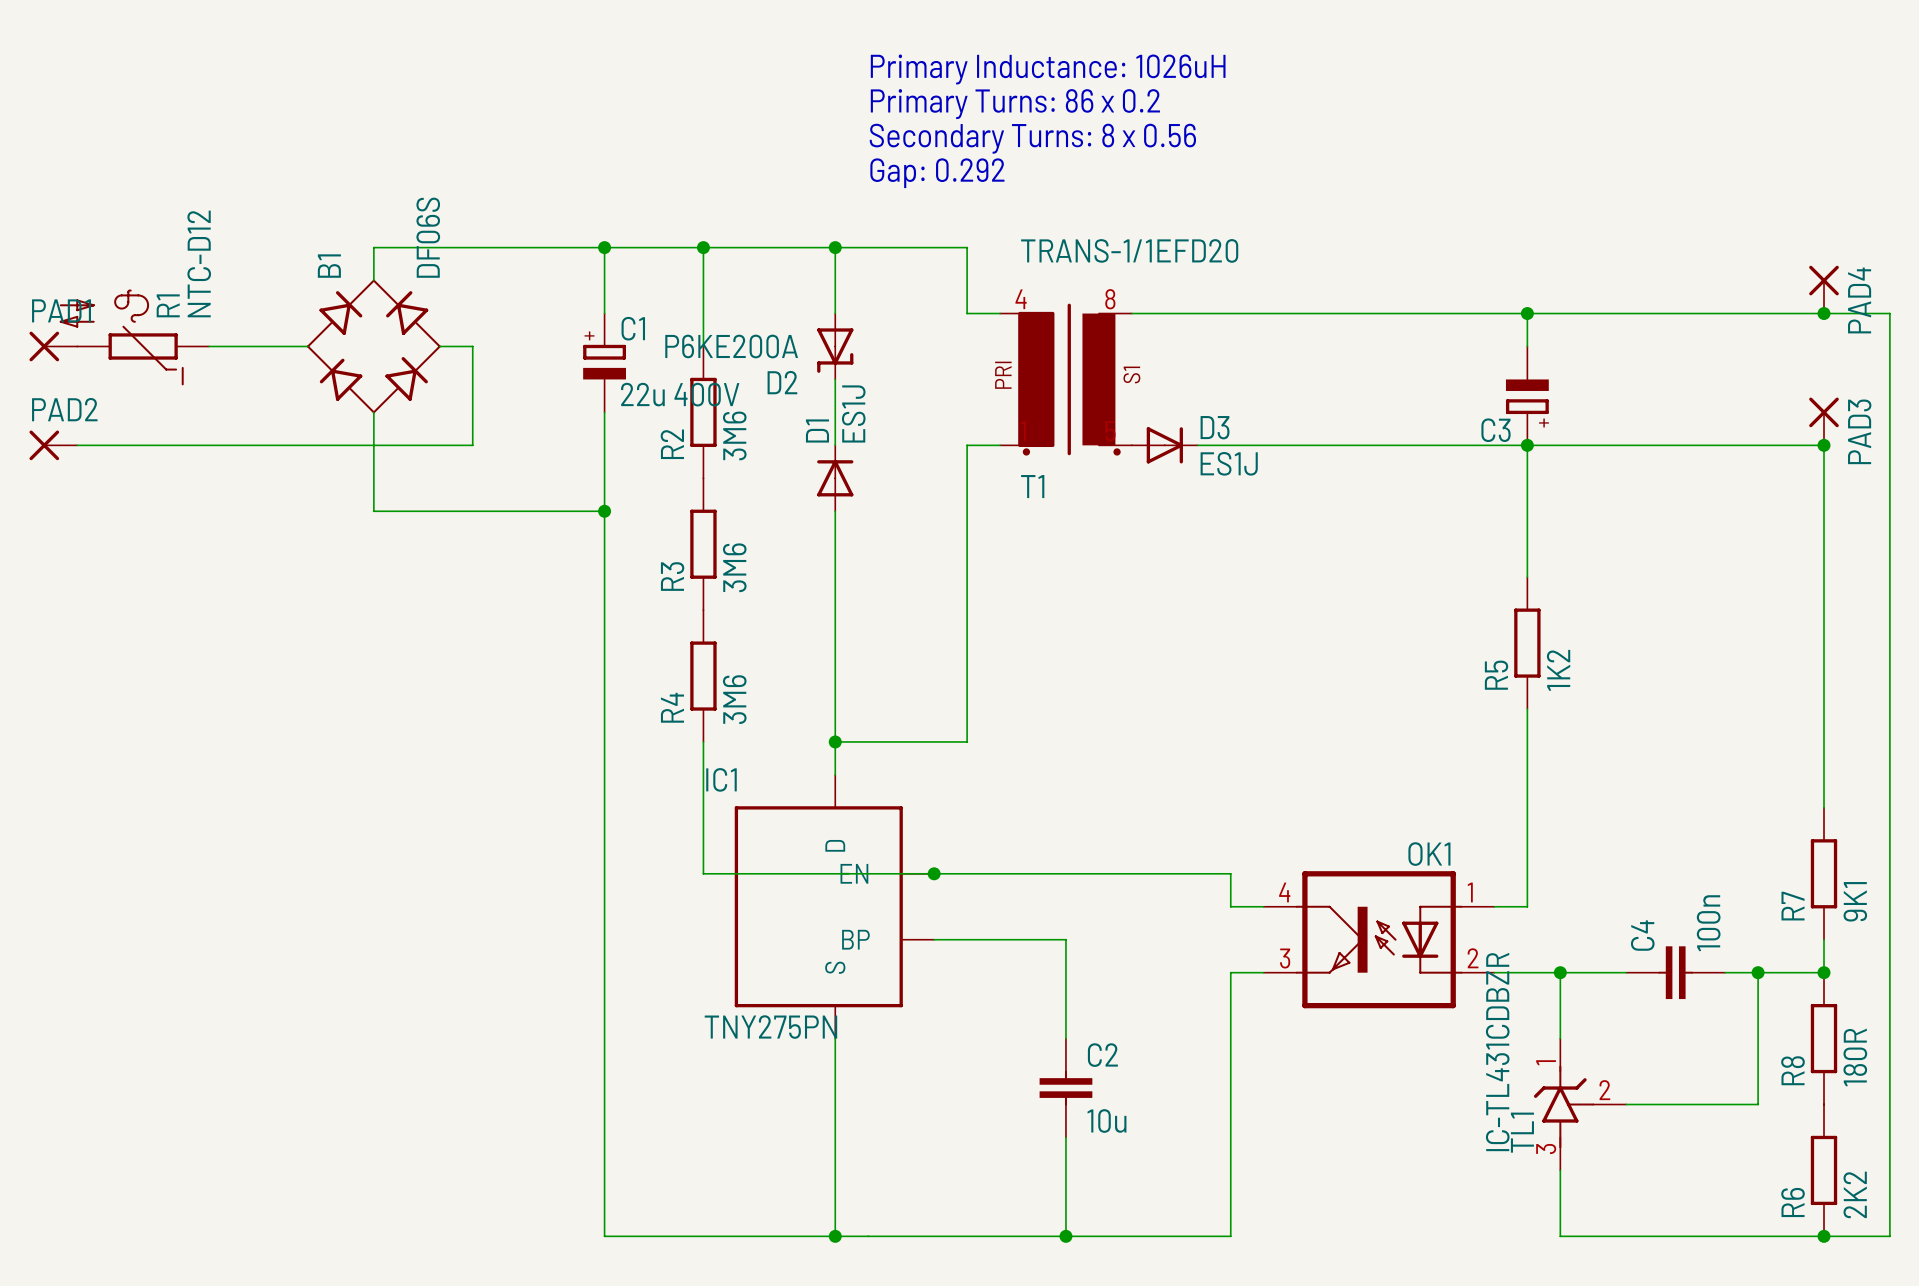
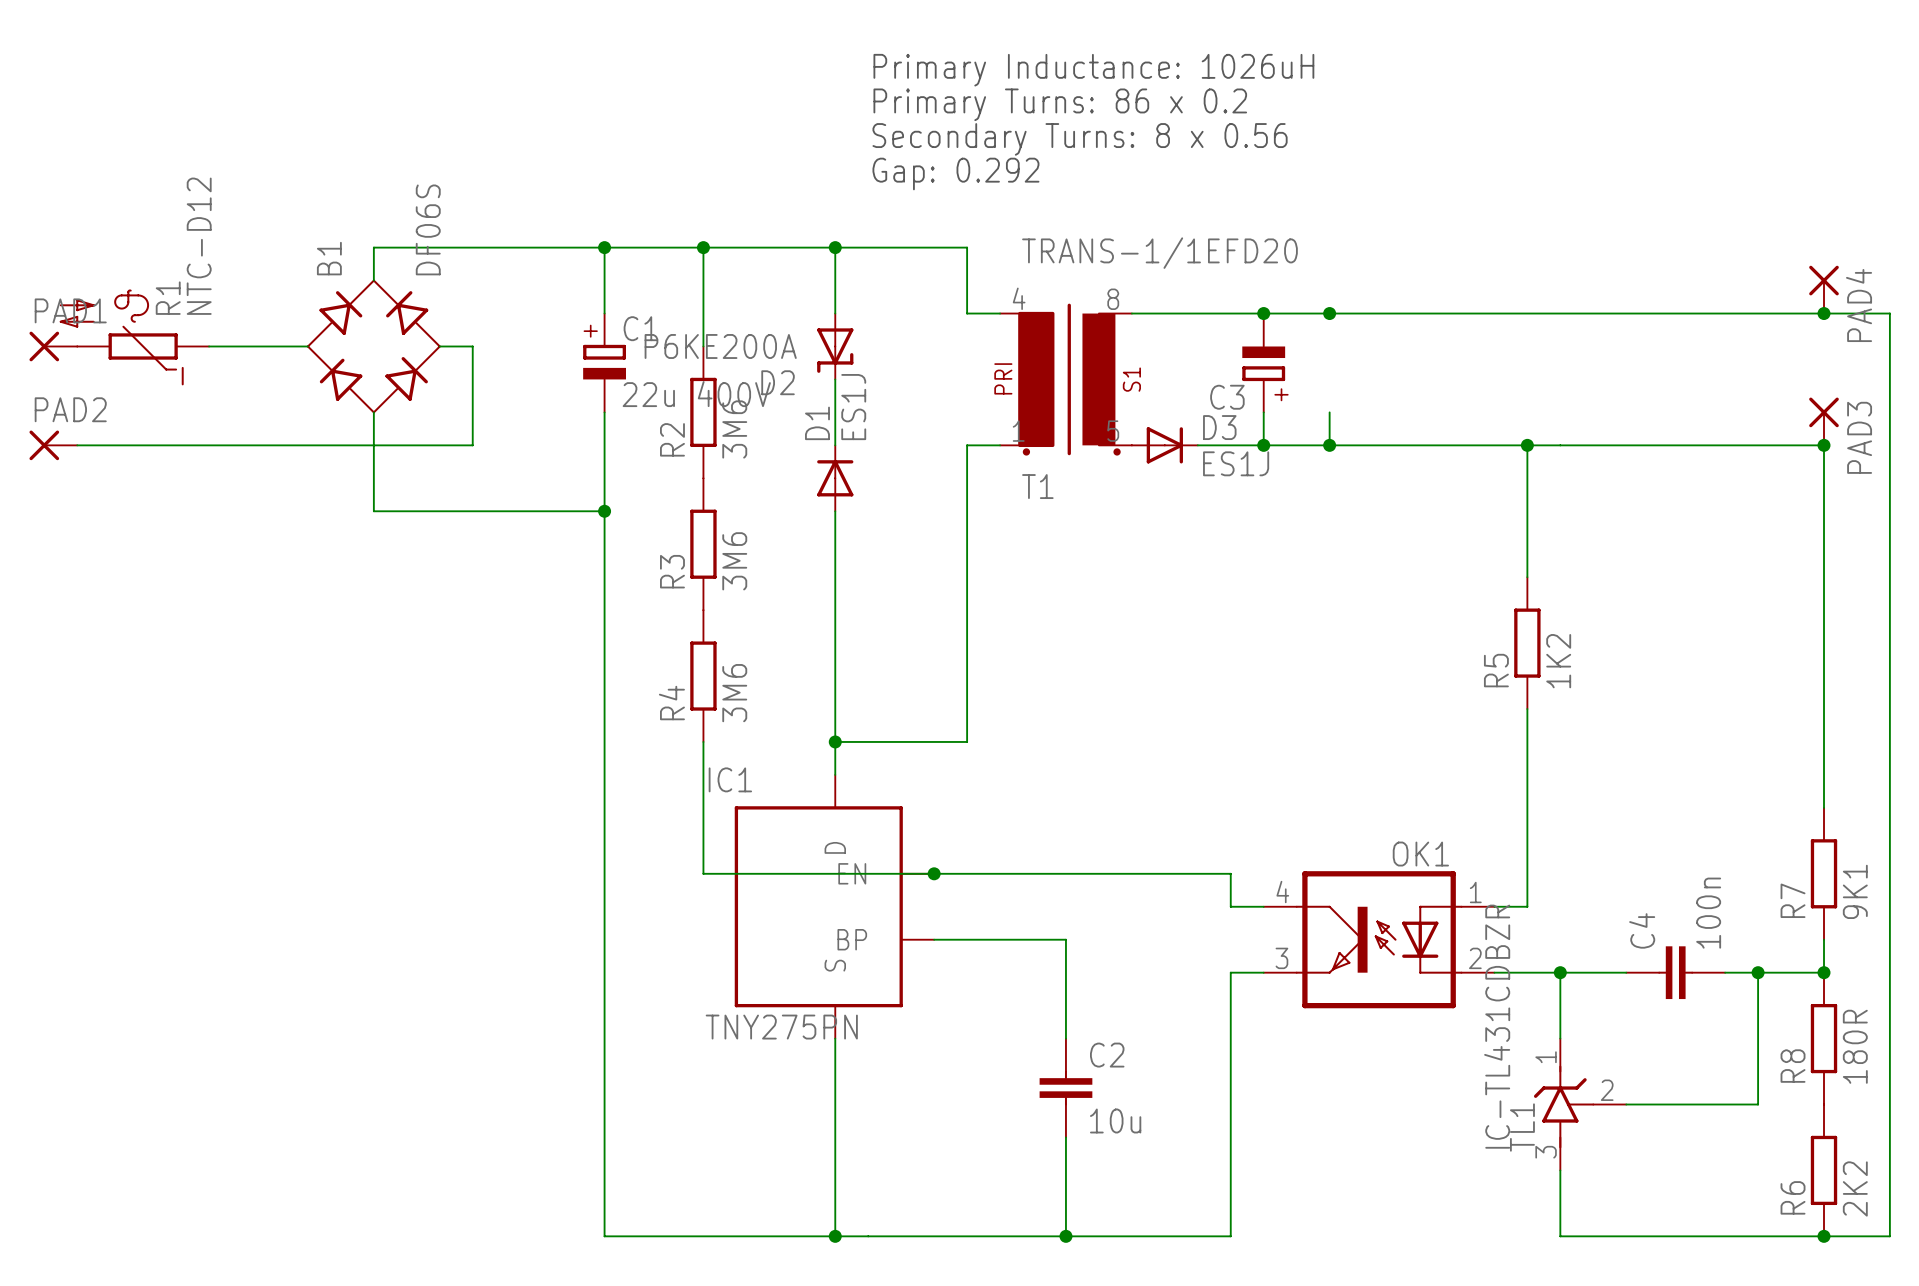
junction: none -> (1263, 313)
junction: none -> (1329, 313)
wire: (1527, 313) (1527, 346) -> (1329, 412) (1329, 445)
junction: (1527, 313) -> none
C3 position: (1527, 395) -> (1263, 362)
wire: none -> (1263, 412) (1263, 445)
junction: none -> (1263, 445)
junction: none -> (1329, 445)

